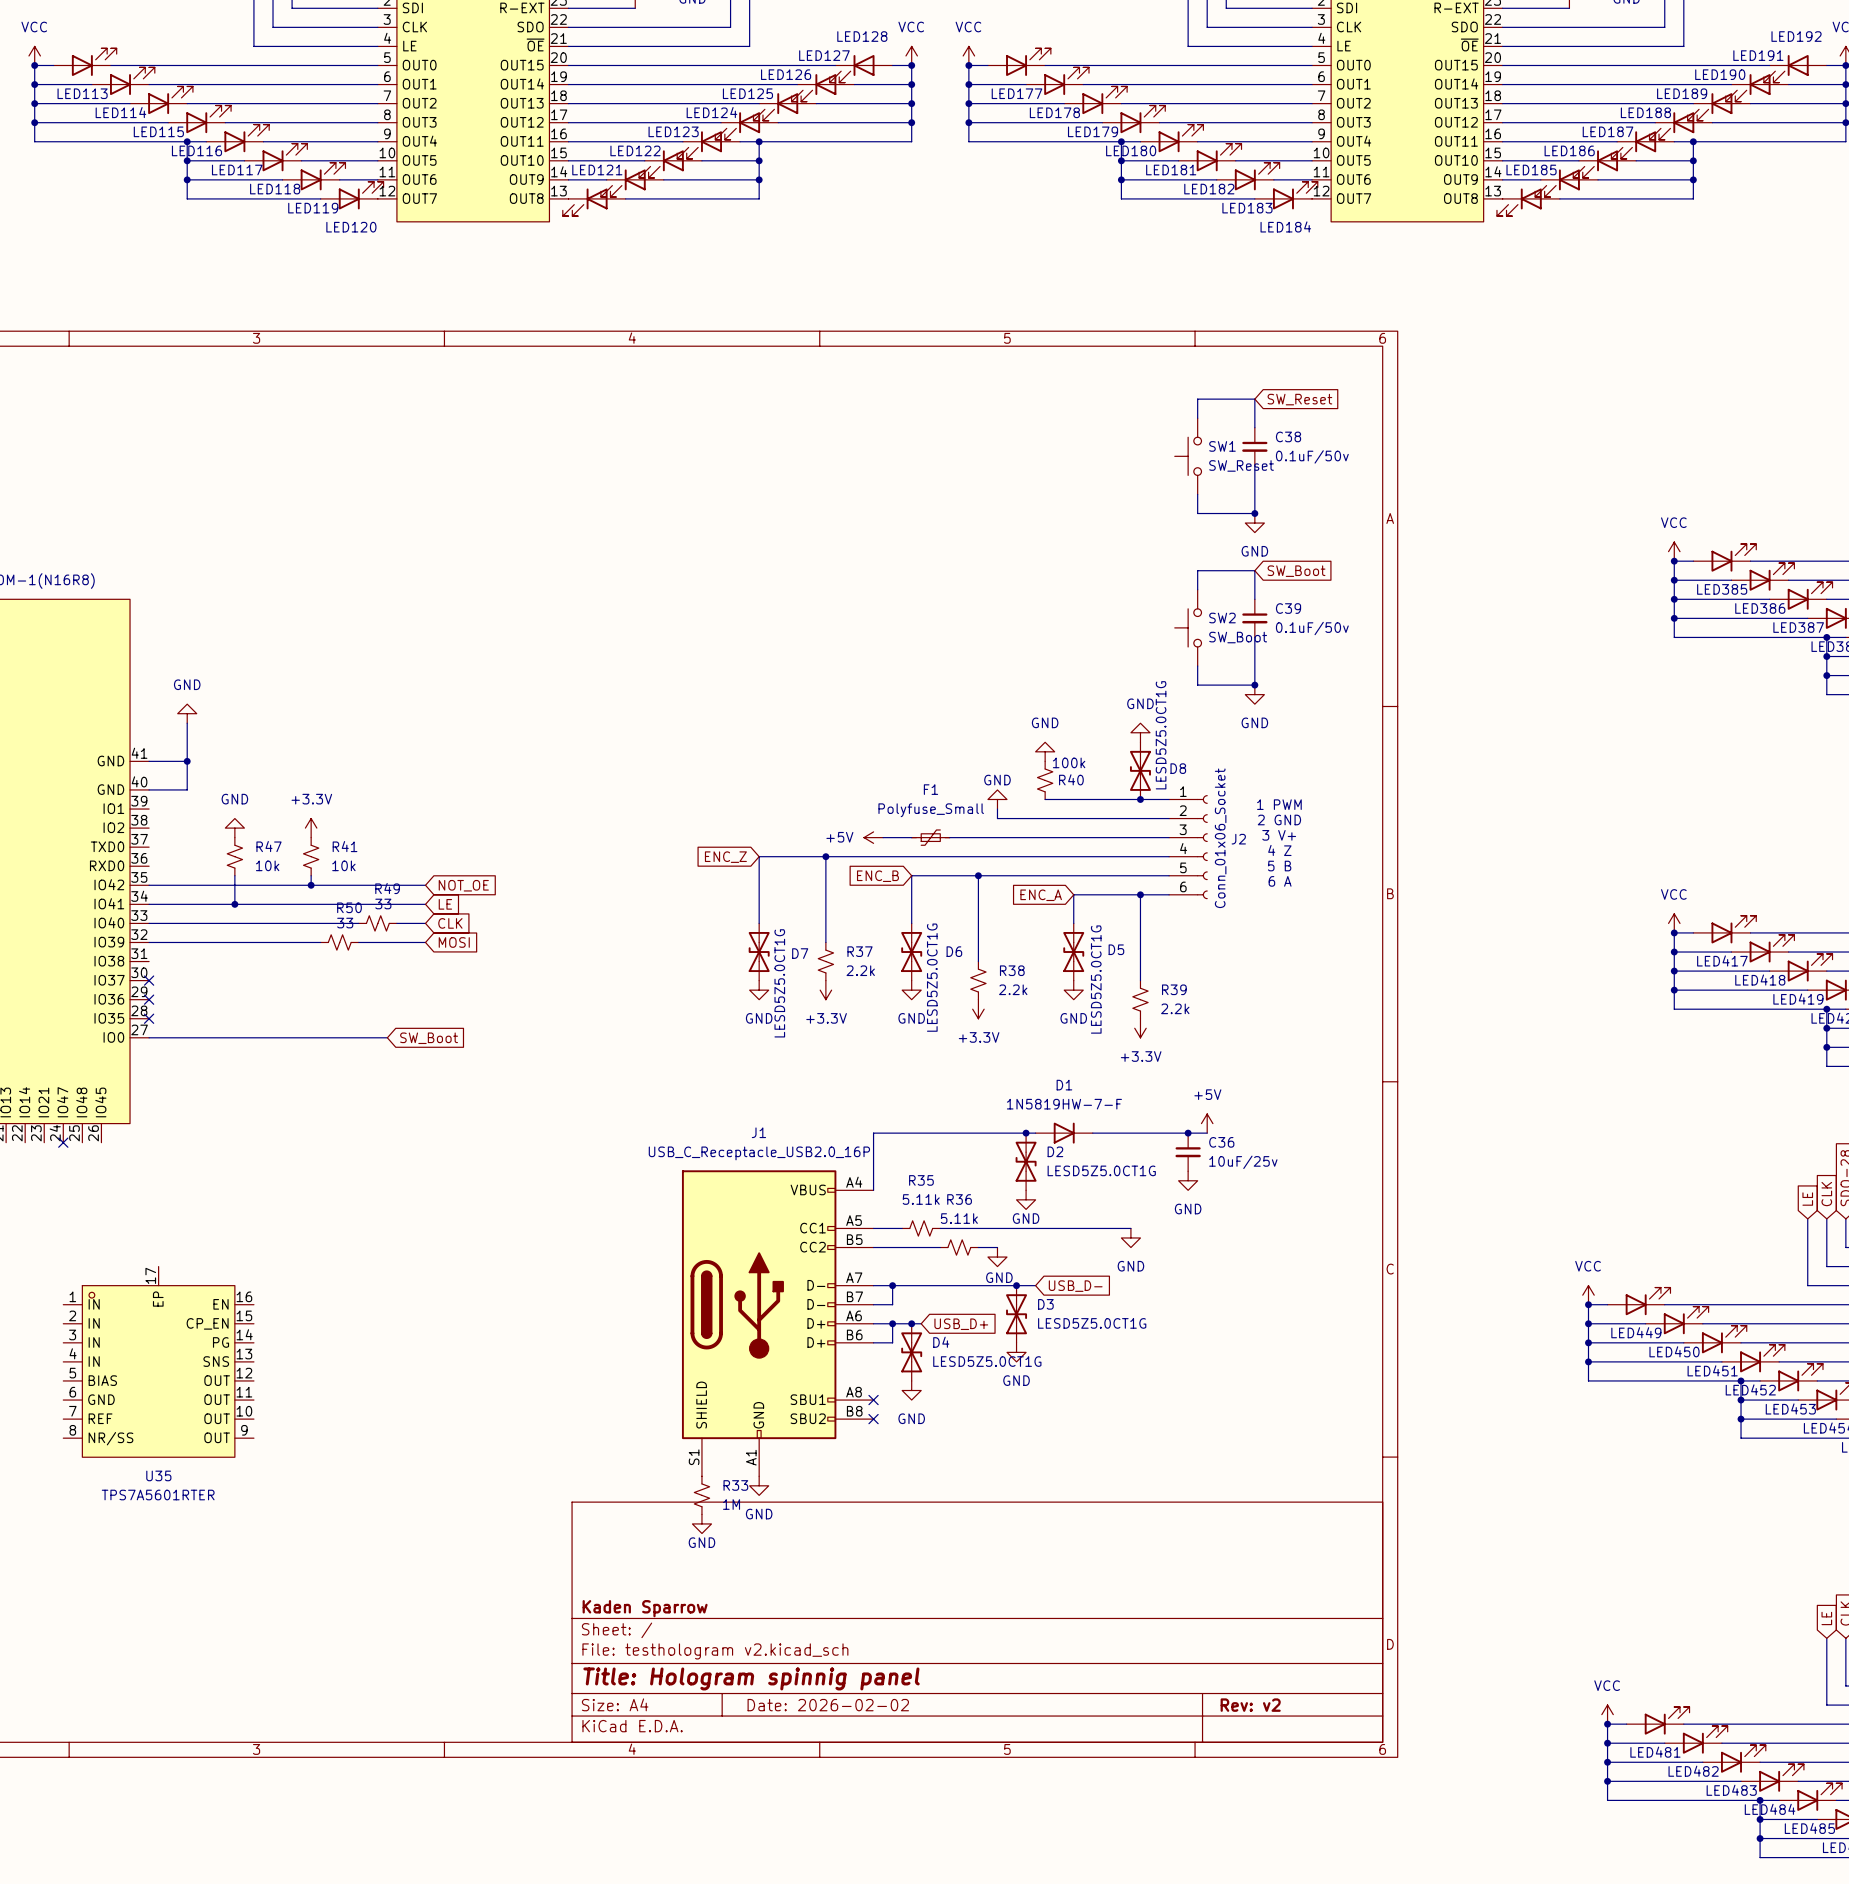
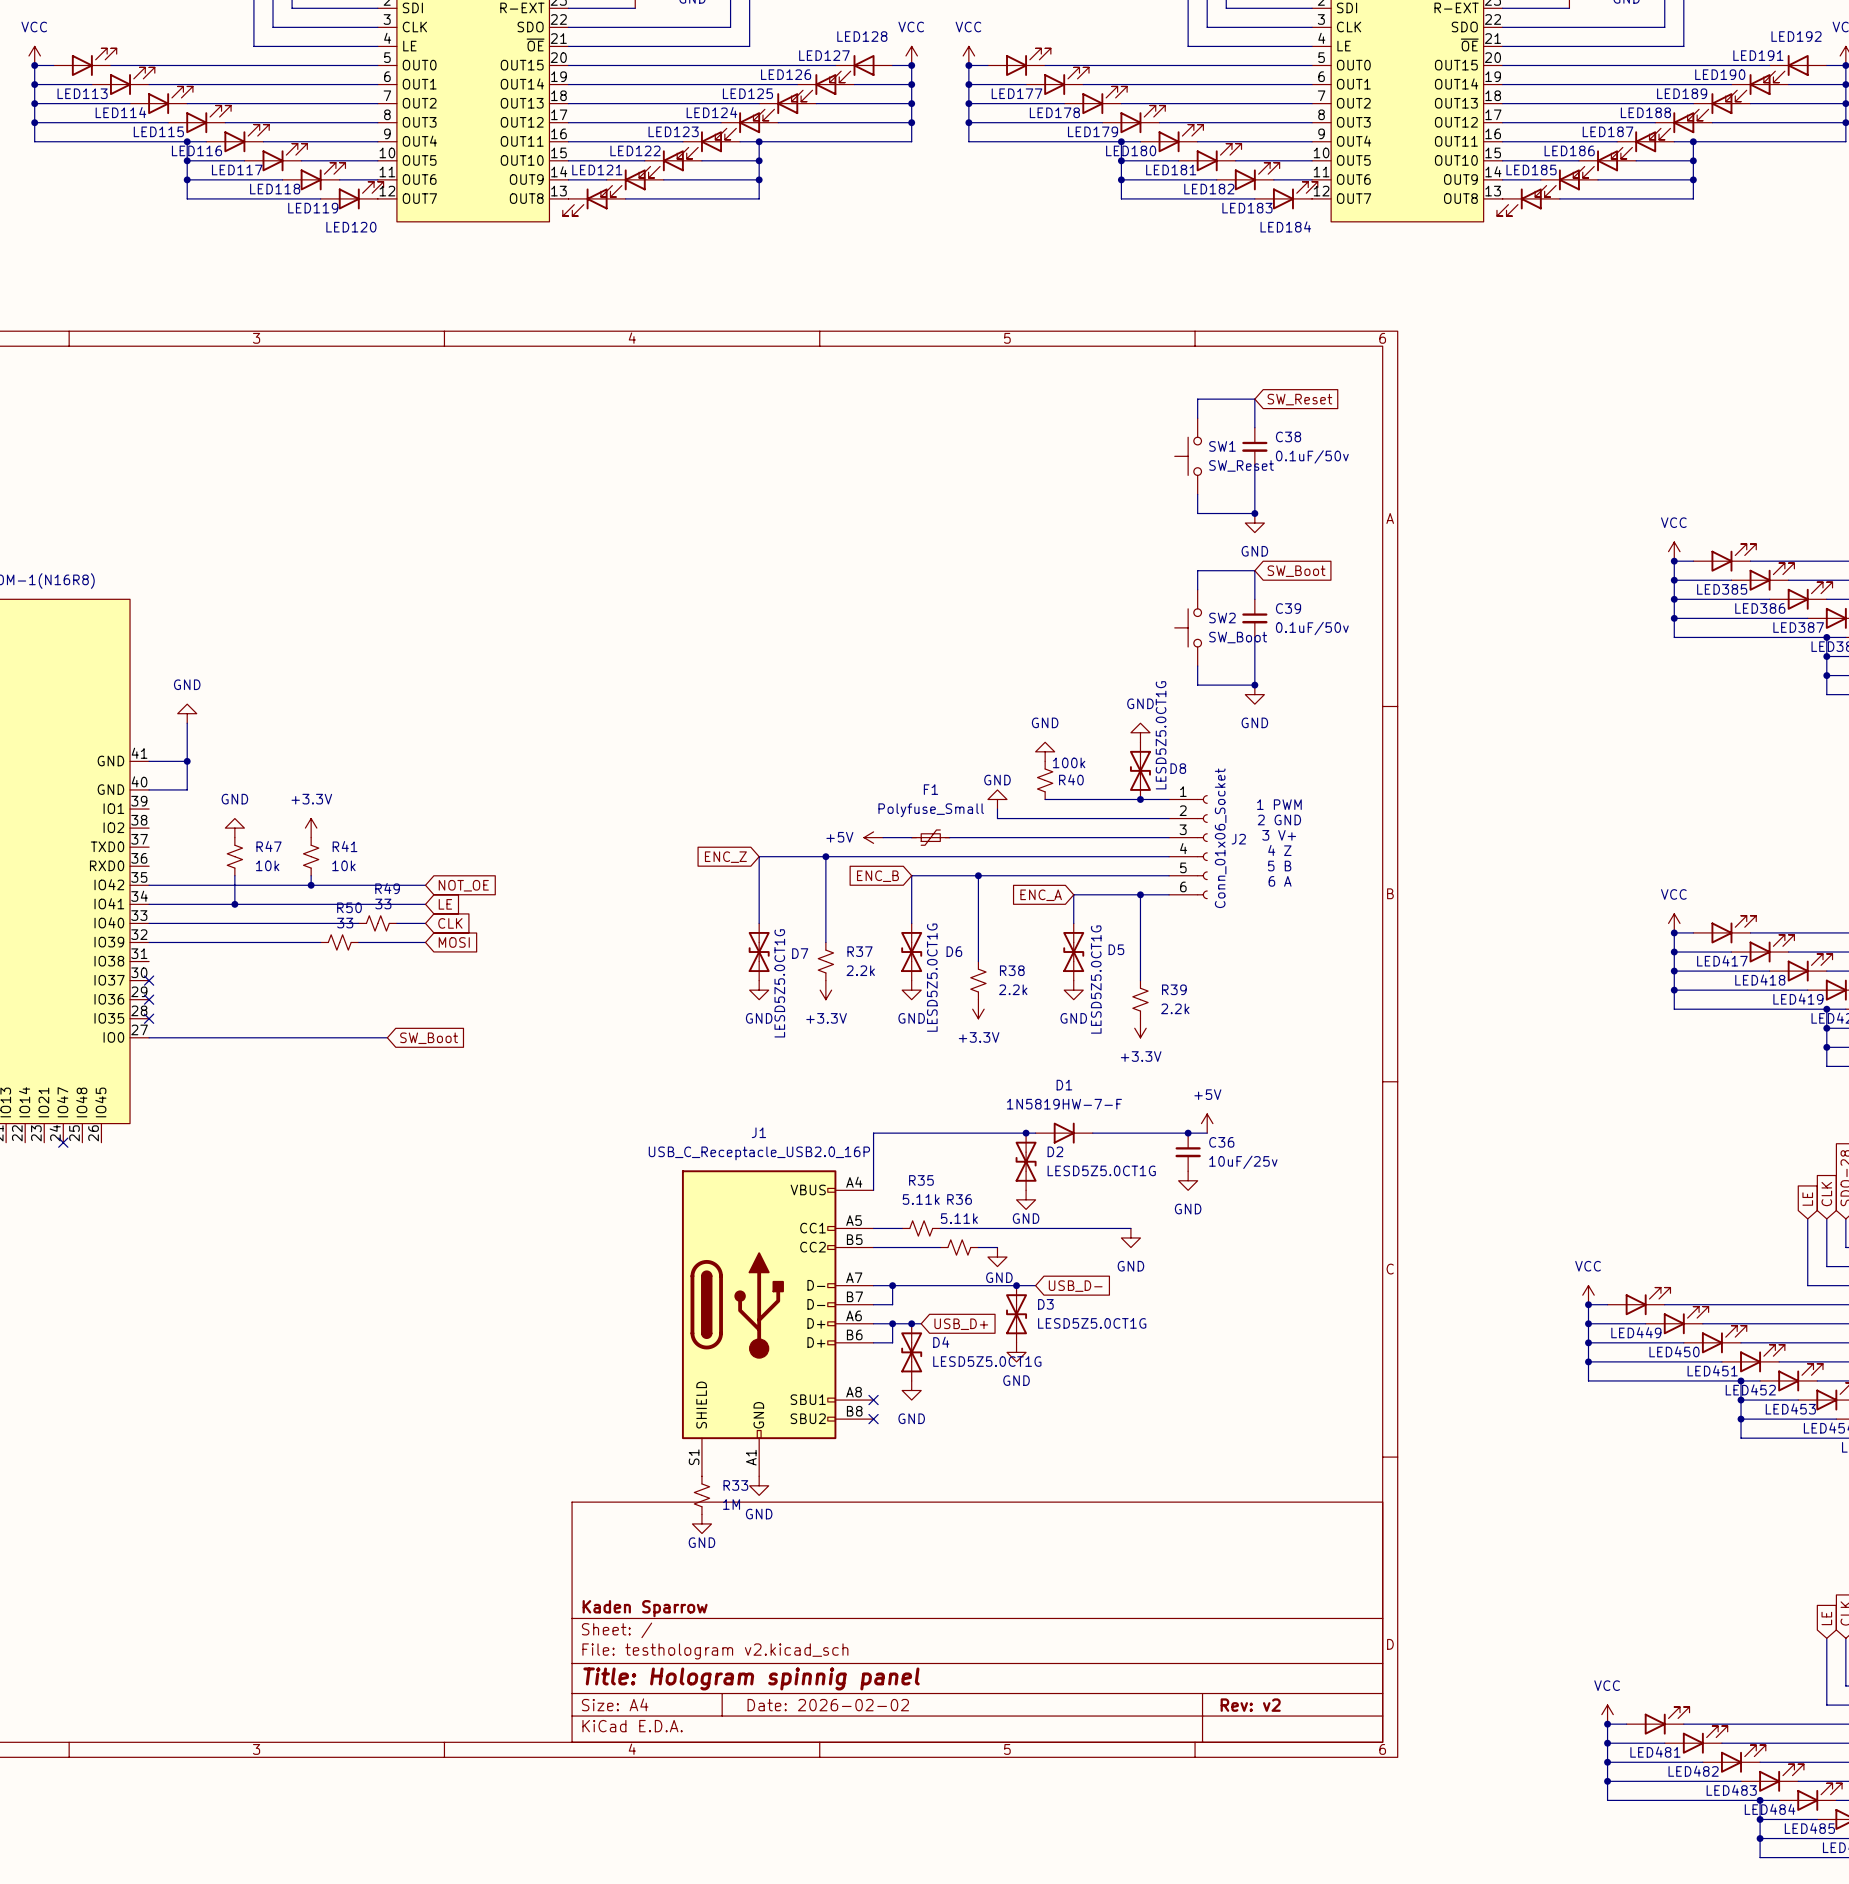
U35: TPS7A5601RTER (158, 1361) -> none

